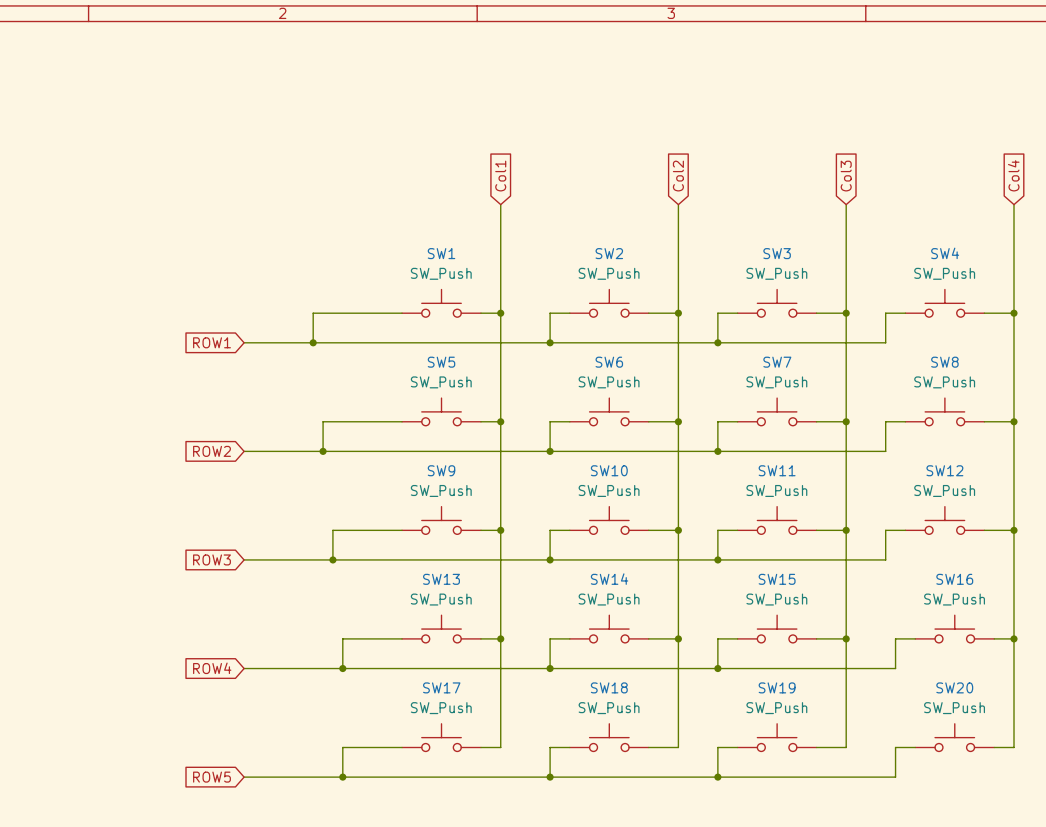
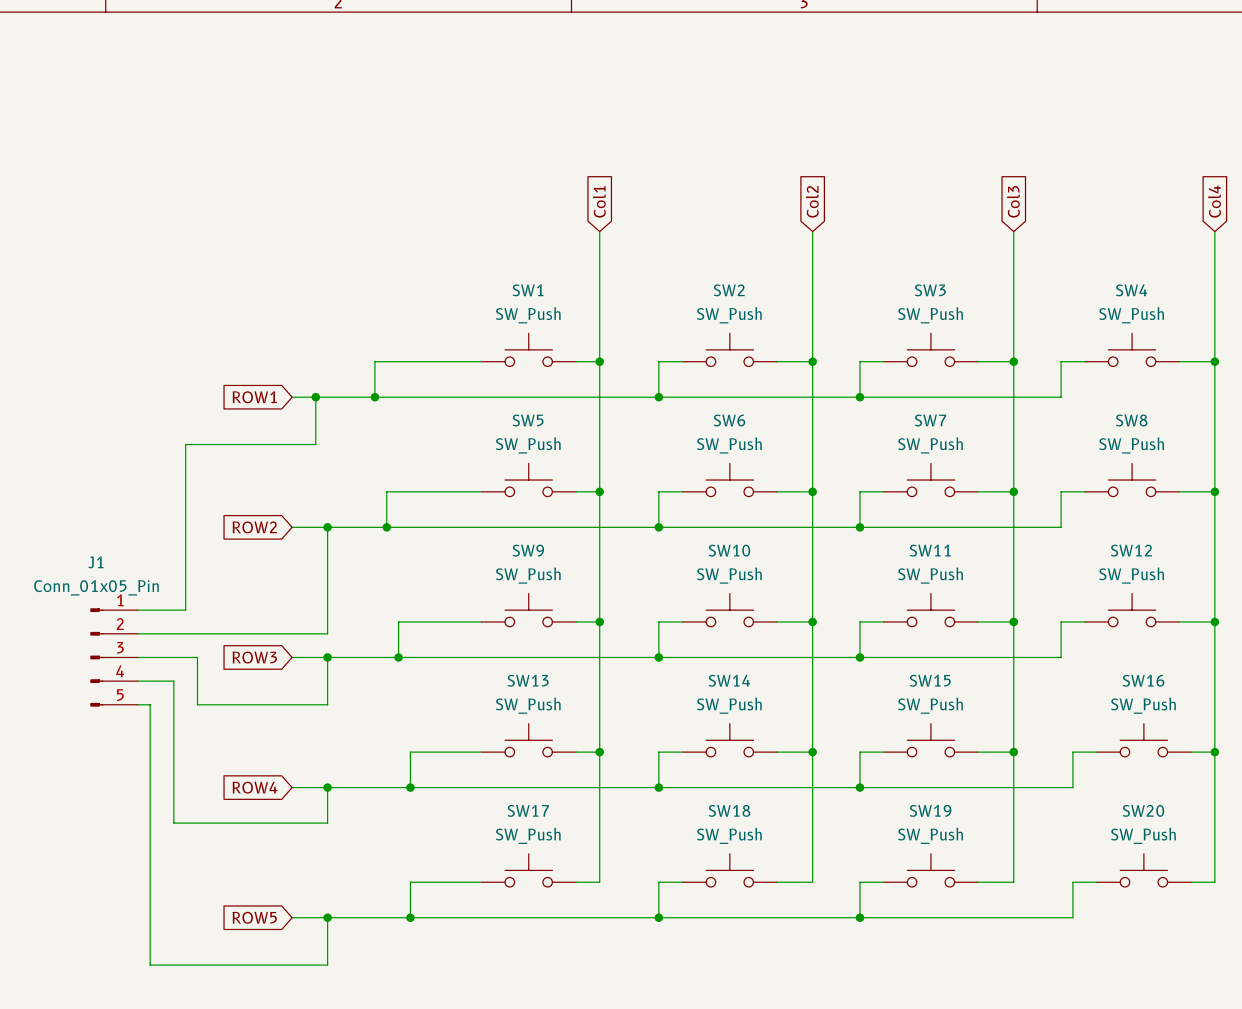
wire: none -> (315, 397) (315, 444) (185, 444) (185, 610) (138, 610)
junction: none -> (315, 397)
wire: none -> (327, 527) (327, 633) (138, 633)
junction: none -> (327, 527)
J1: none -> Conn_01x05_Pin (114, 657)
wire: none -> (138, 657) (197, 657) (197, 704) (327, 704) (327, 657)
junction: none -> (327, 657)
wire: none -> (138, 681) (173, 681) (173, 823) (327, 823) (327, 787)
wire: none -> (138, 704) (150, 704) (150, 965) (327, 965) (327, 917)
junction: none -> (327, 787)
junction: none -> (327, 917)

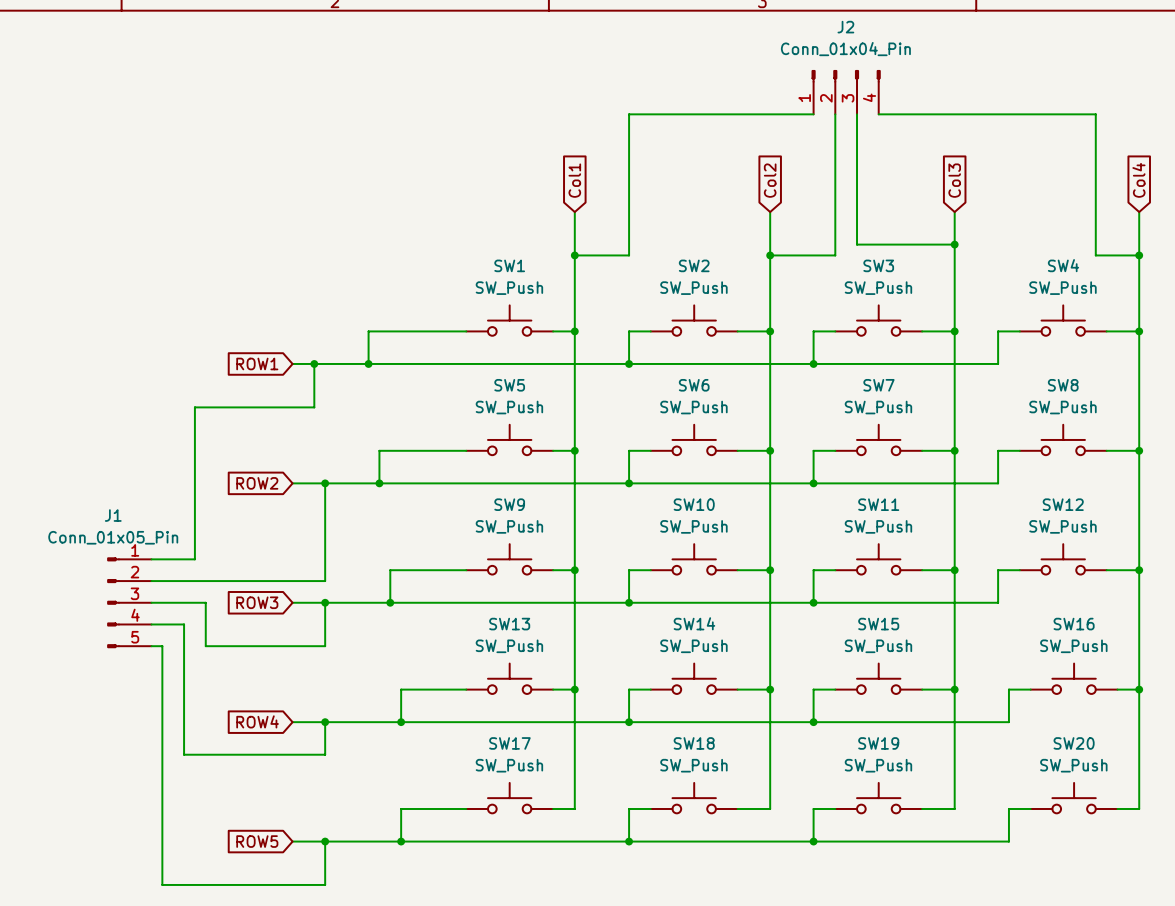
J2: none -> Conn_01x04_Pin (846, 92)
wire: none -> (813, 114) (629, 114) (629, 255) (574, 255)
wire: none -> (835, 114) (835, 255) (770, 255)
wire: none -> (857, 114) (857, 244) (954, 244)
wire: none -> (878, 114) (1095, 114) (1095, 255) (1139, 255)
junction: none -> (954, 244)
junction: none -> (574, 255)
junction: none -> (770, 255)
junction: none -> (1139, 255)

